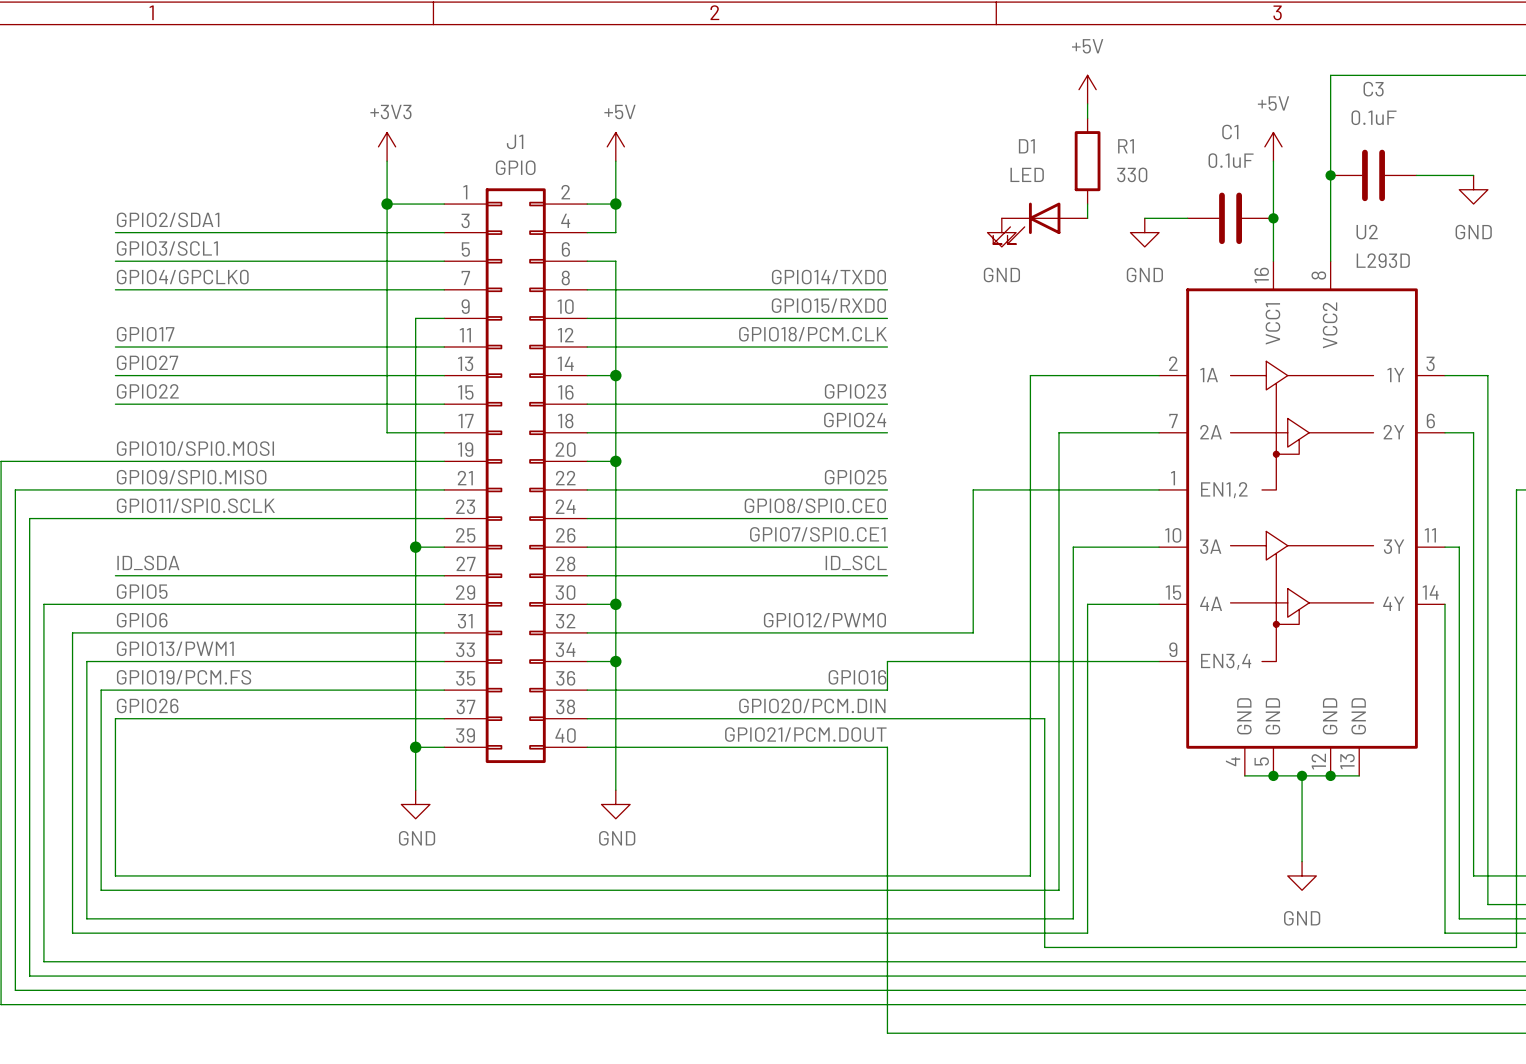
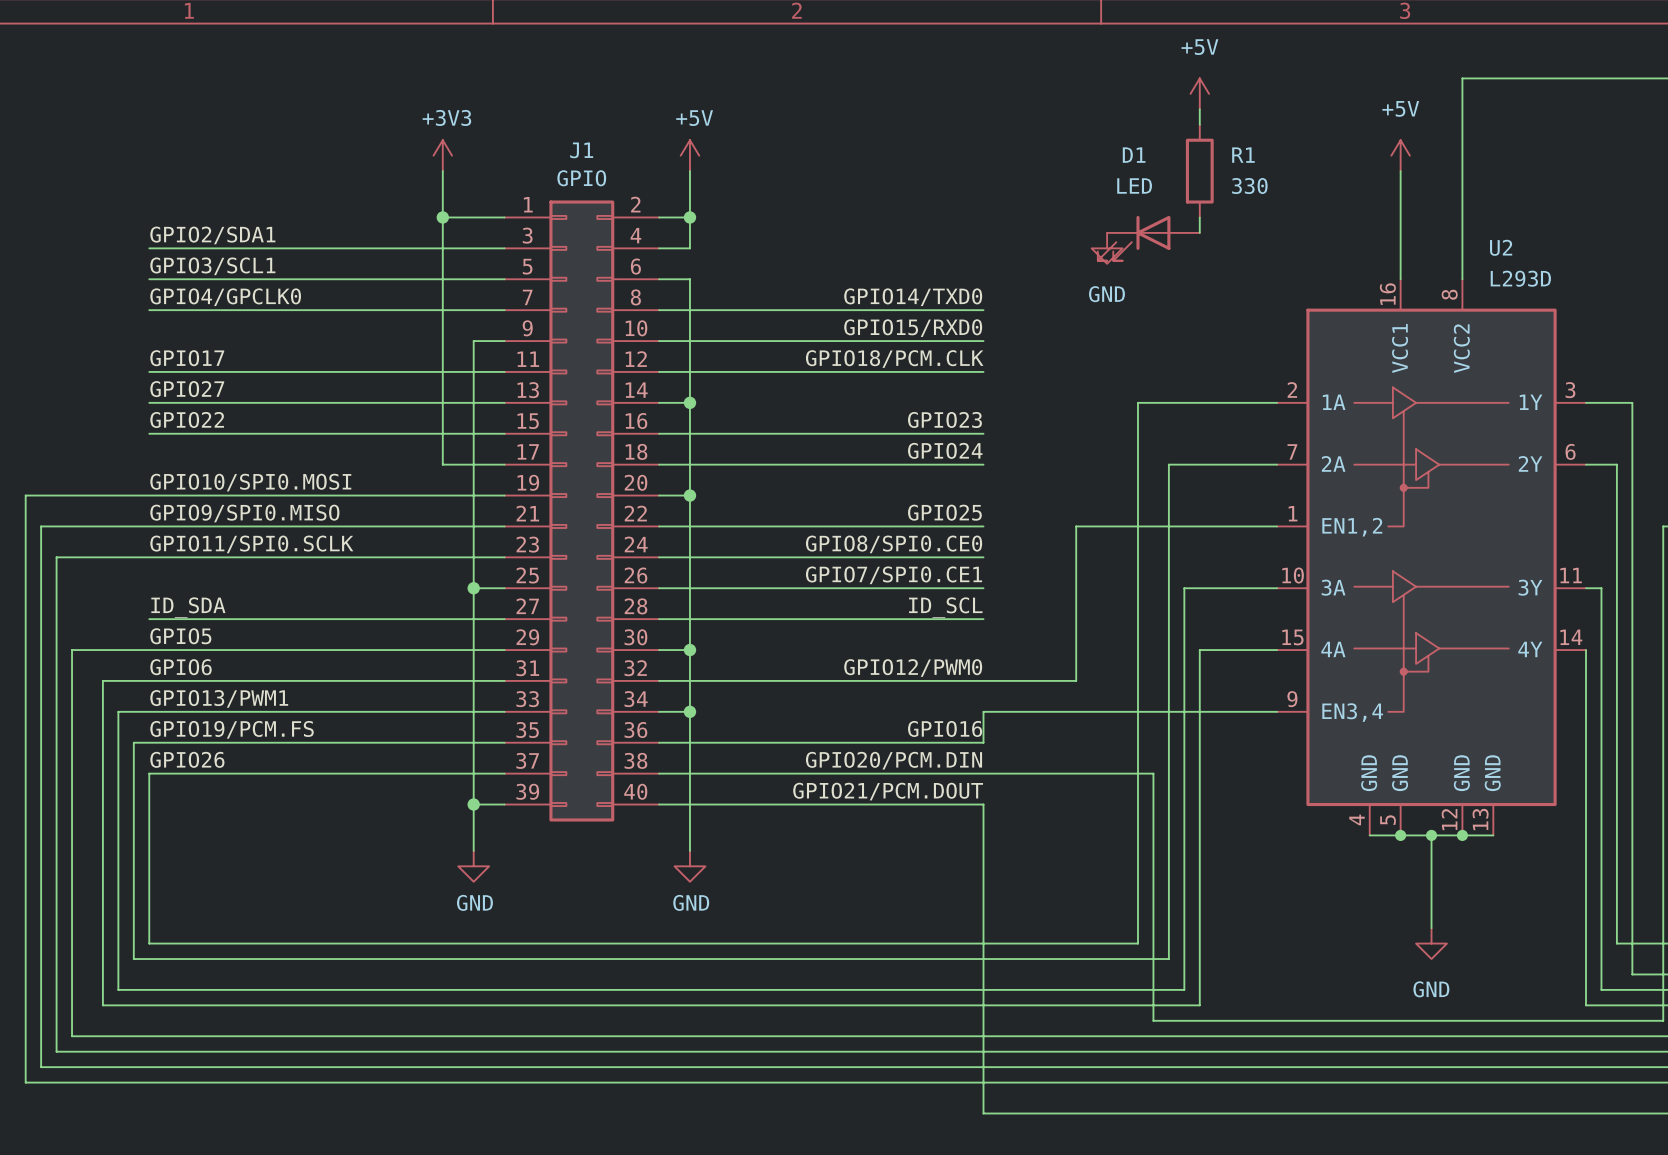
junction: (1330, 175) -> none
C3: 0.1uF (1373, 175) -> none
wire: (1416, 175) (1473, 175) -> none
power symbol: GND (1473, 189) -> none
wire: (1144, 218) (1187, 218) -> none
C1: 0.1uF (1230, 218) -> none
junction: (1273, 218) -> none
power symbol: GND (1144, 232) -> none

